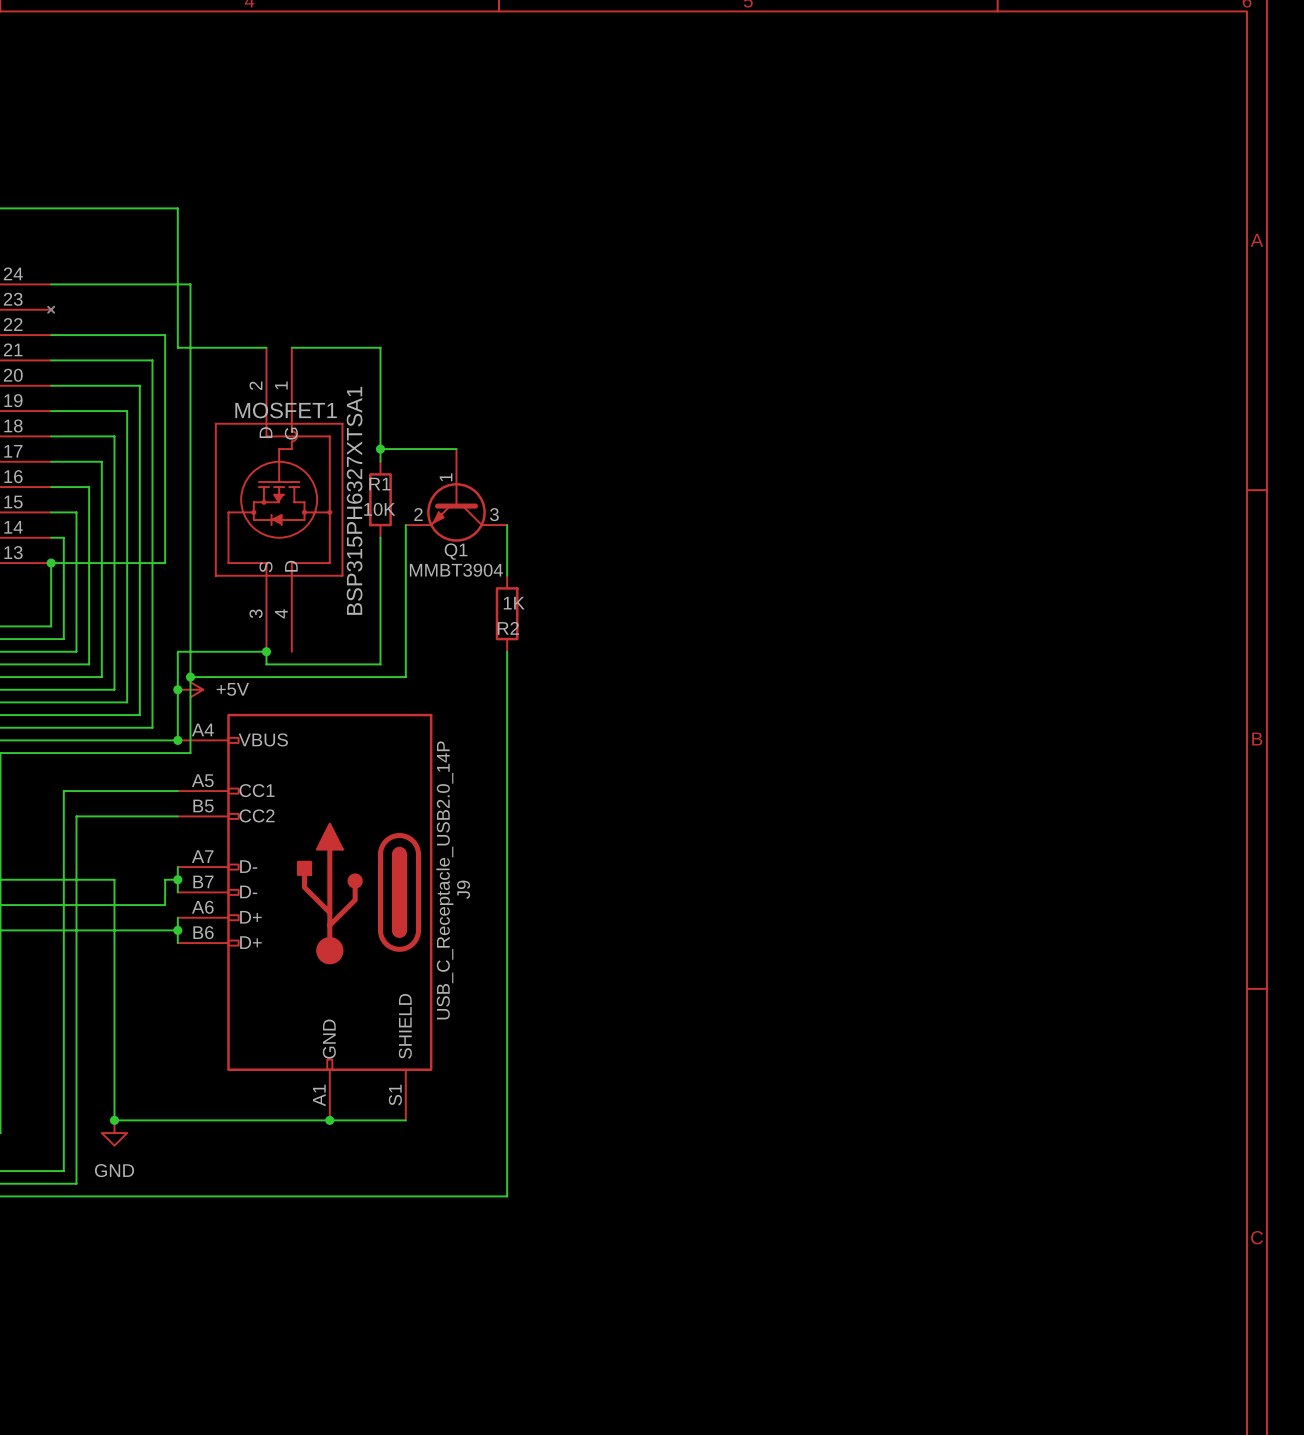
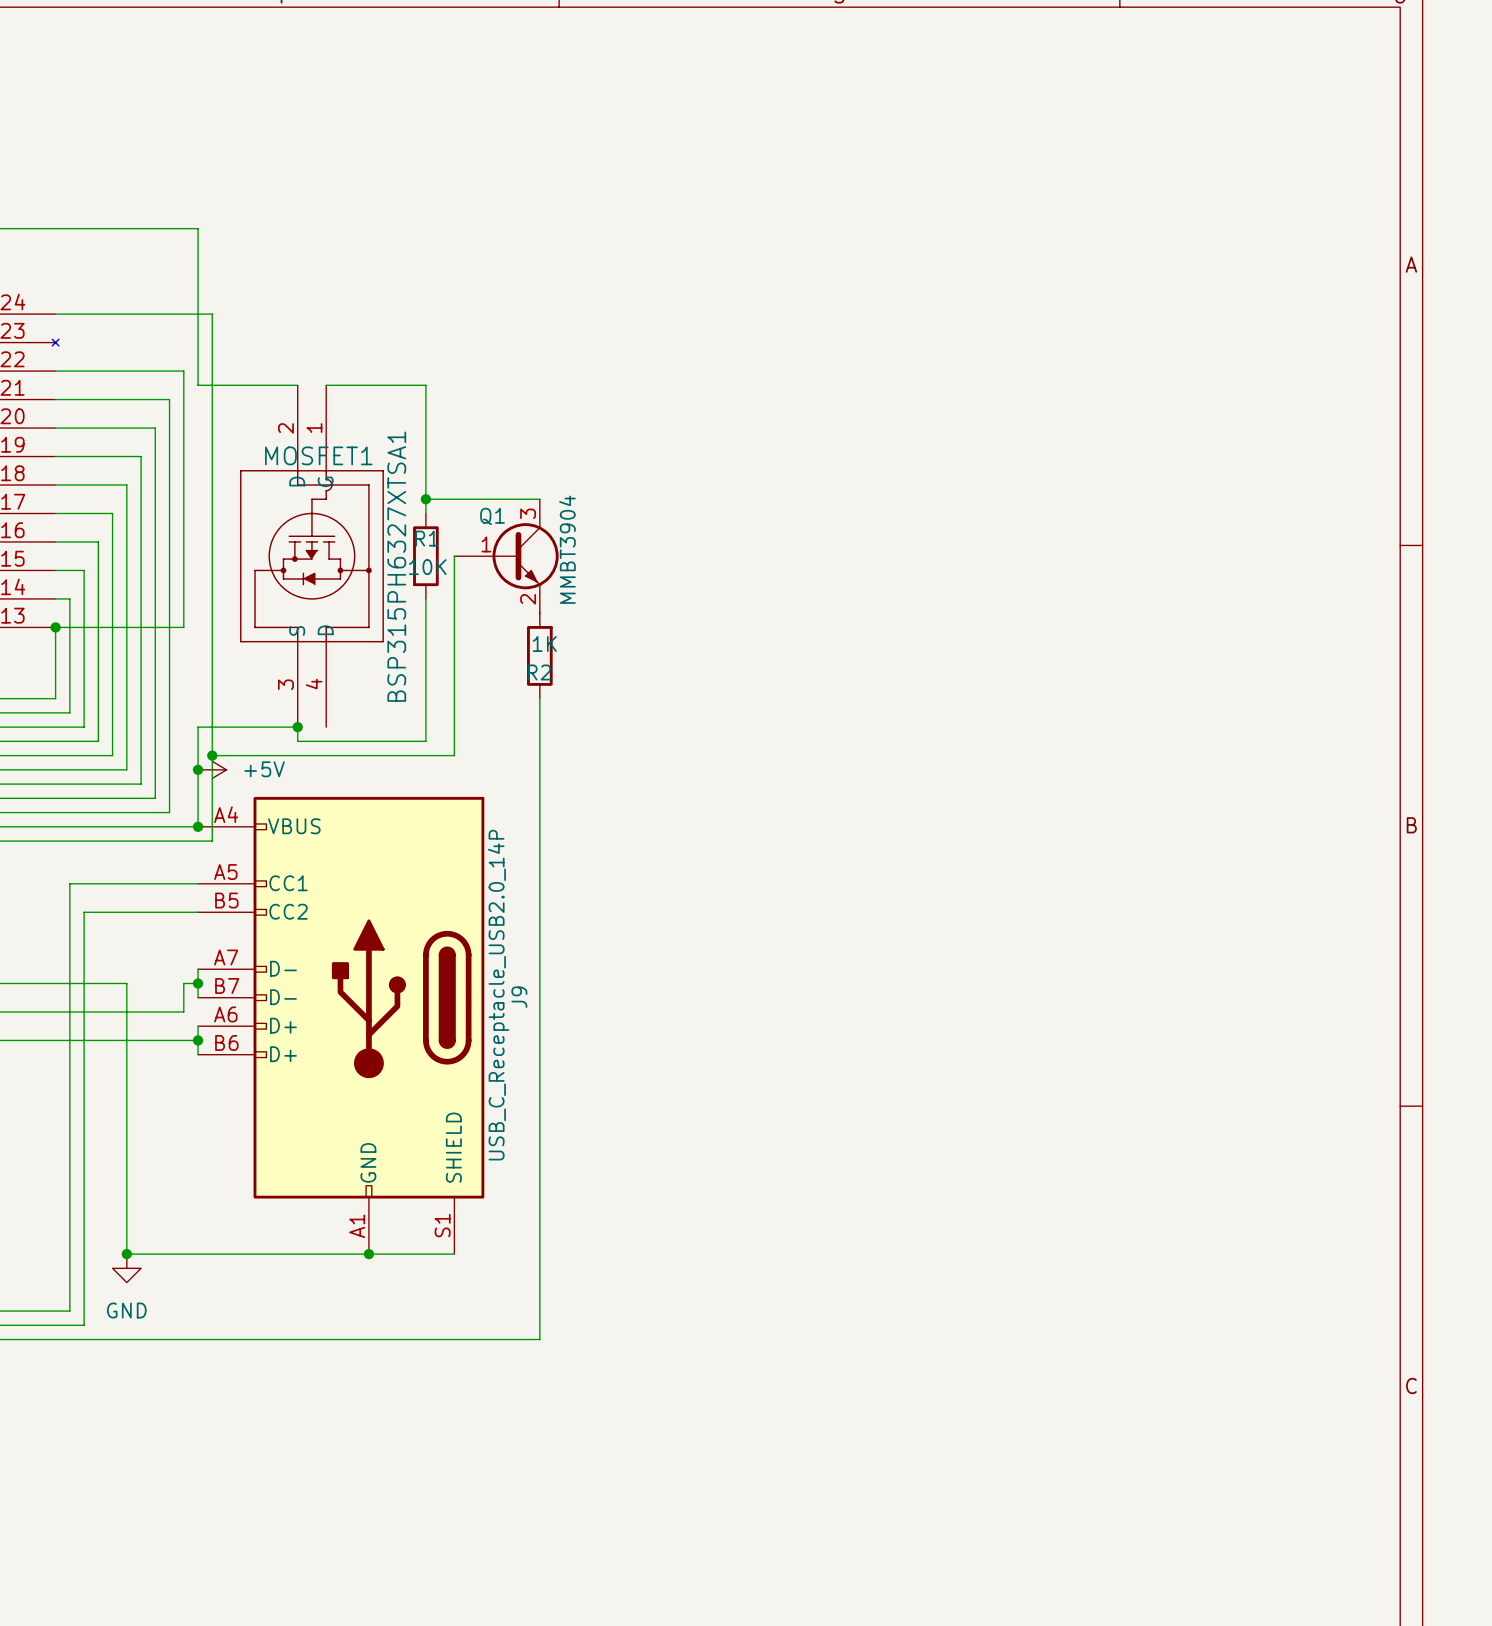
wire: none -> (511, 499) (539, 499)
wire: none -> (454, 556) (454, 584)
Q1 rotation: 0° (456, 512) -> 90° counterclockwise (525, 556)
wire: (507, 525) (507, 575) -> none
Q1 name position: Q1 (456, 551) -> Q1 (492, 516)
Q1 value position: MMBT3904 (456, 570) -> MMBT3904 (567, 549)
R2 position: (507, 613) -> (539, 655)
wire: (507, 651) (507, 1196) (481, 1196) -> (539, 698) (539, 1339)

